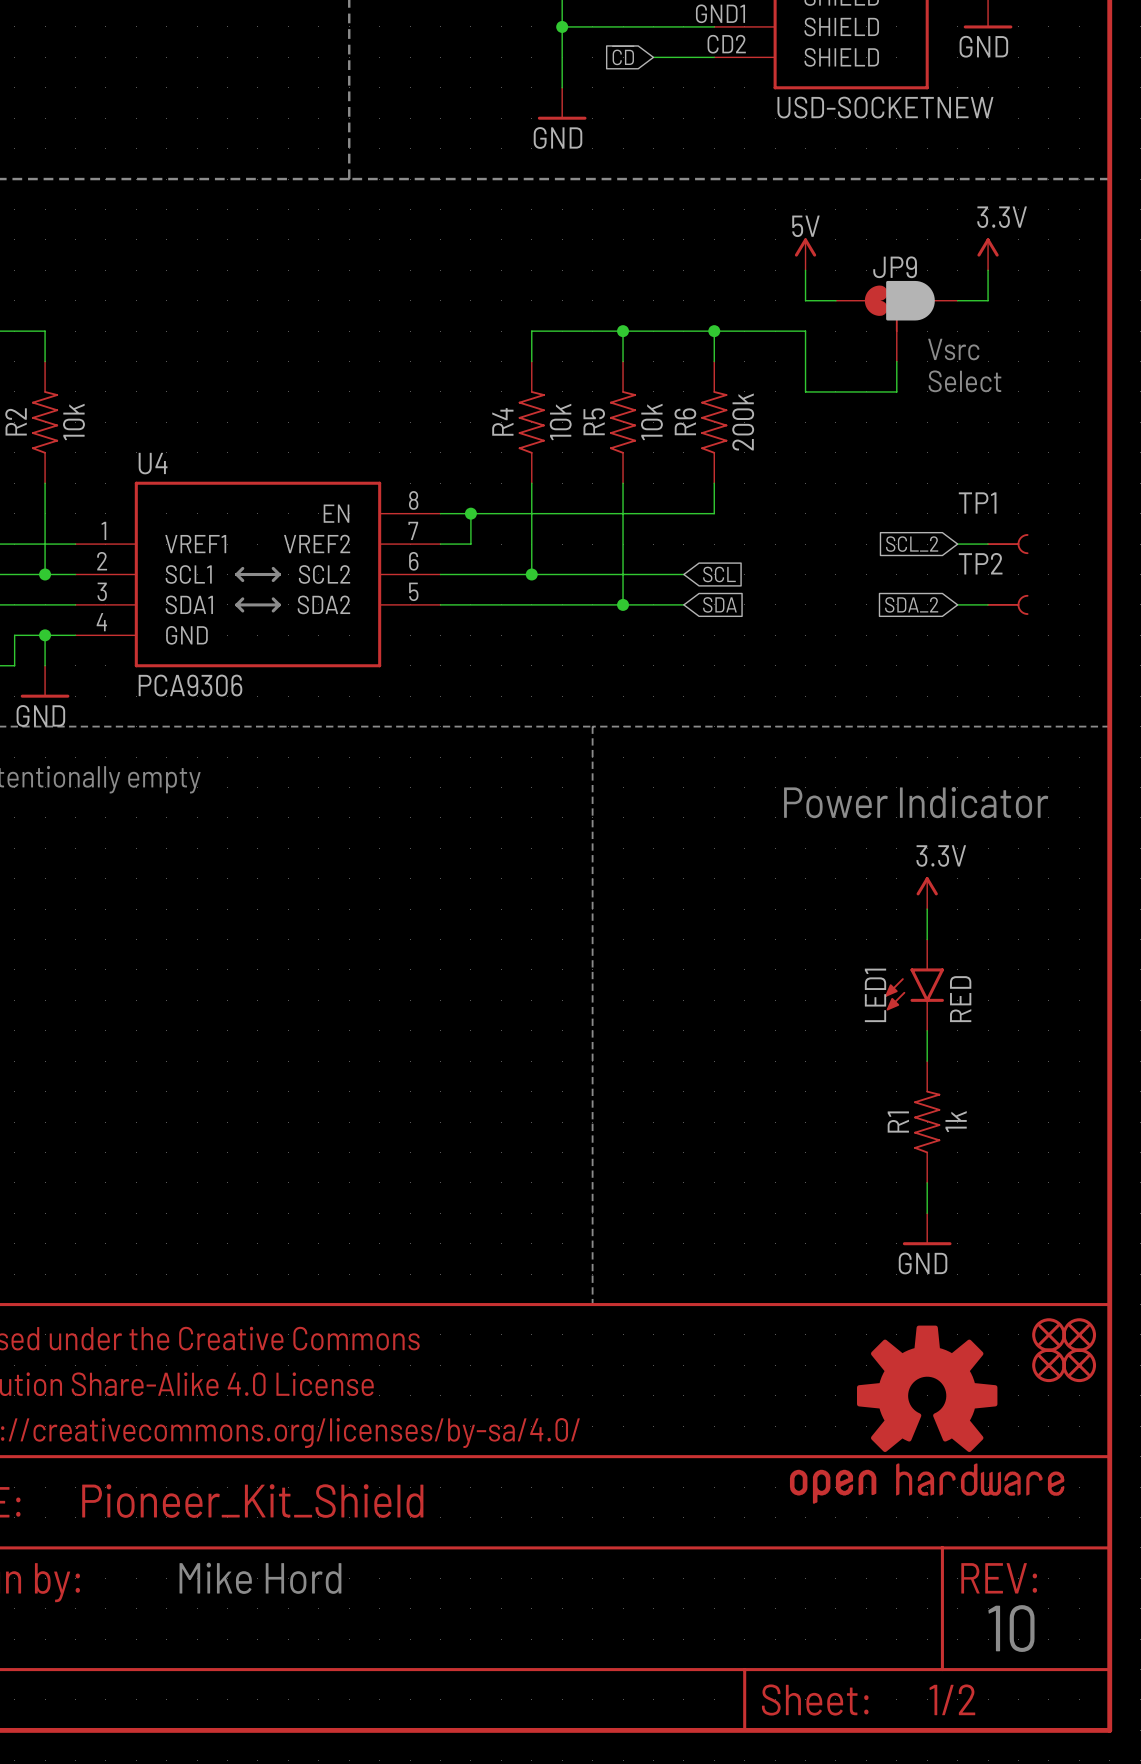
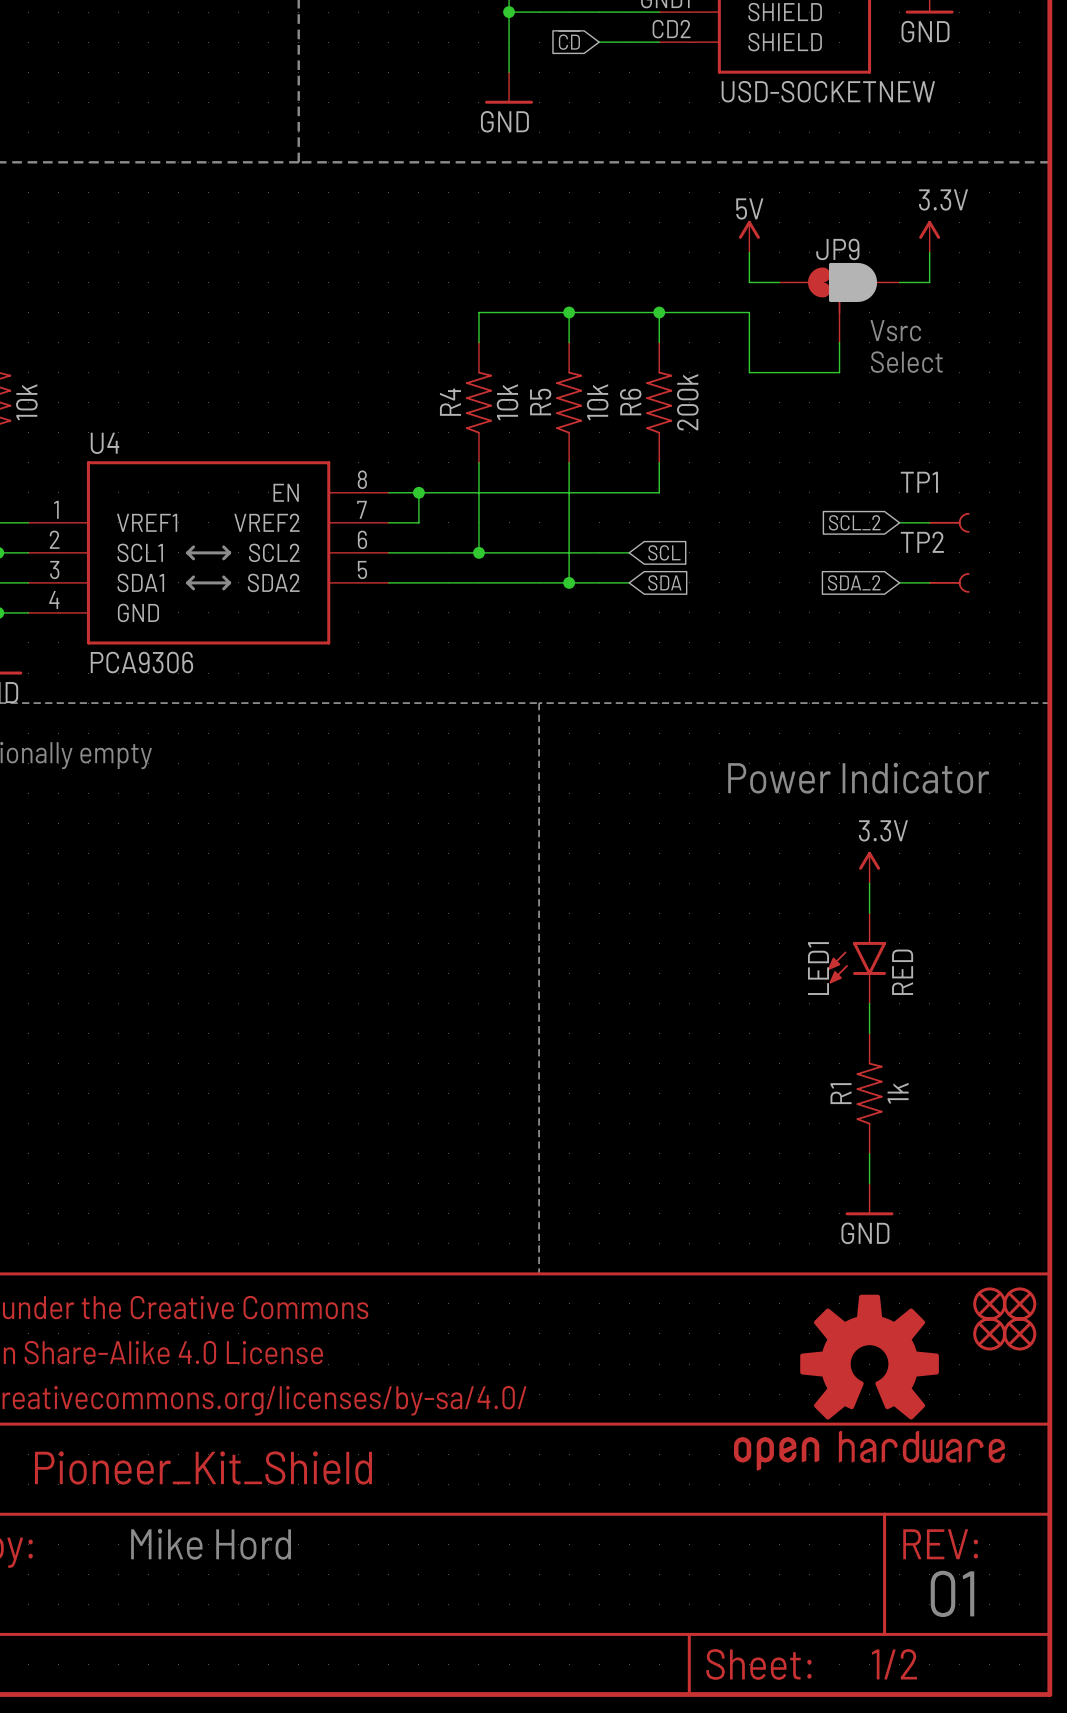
text: 10 (1011, 1628) -> 01 (952, 1593)

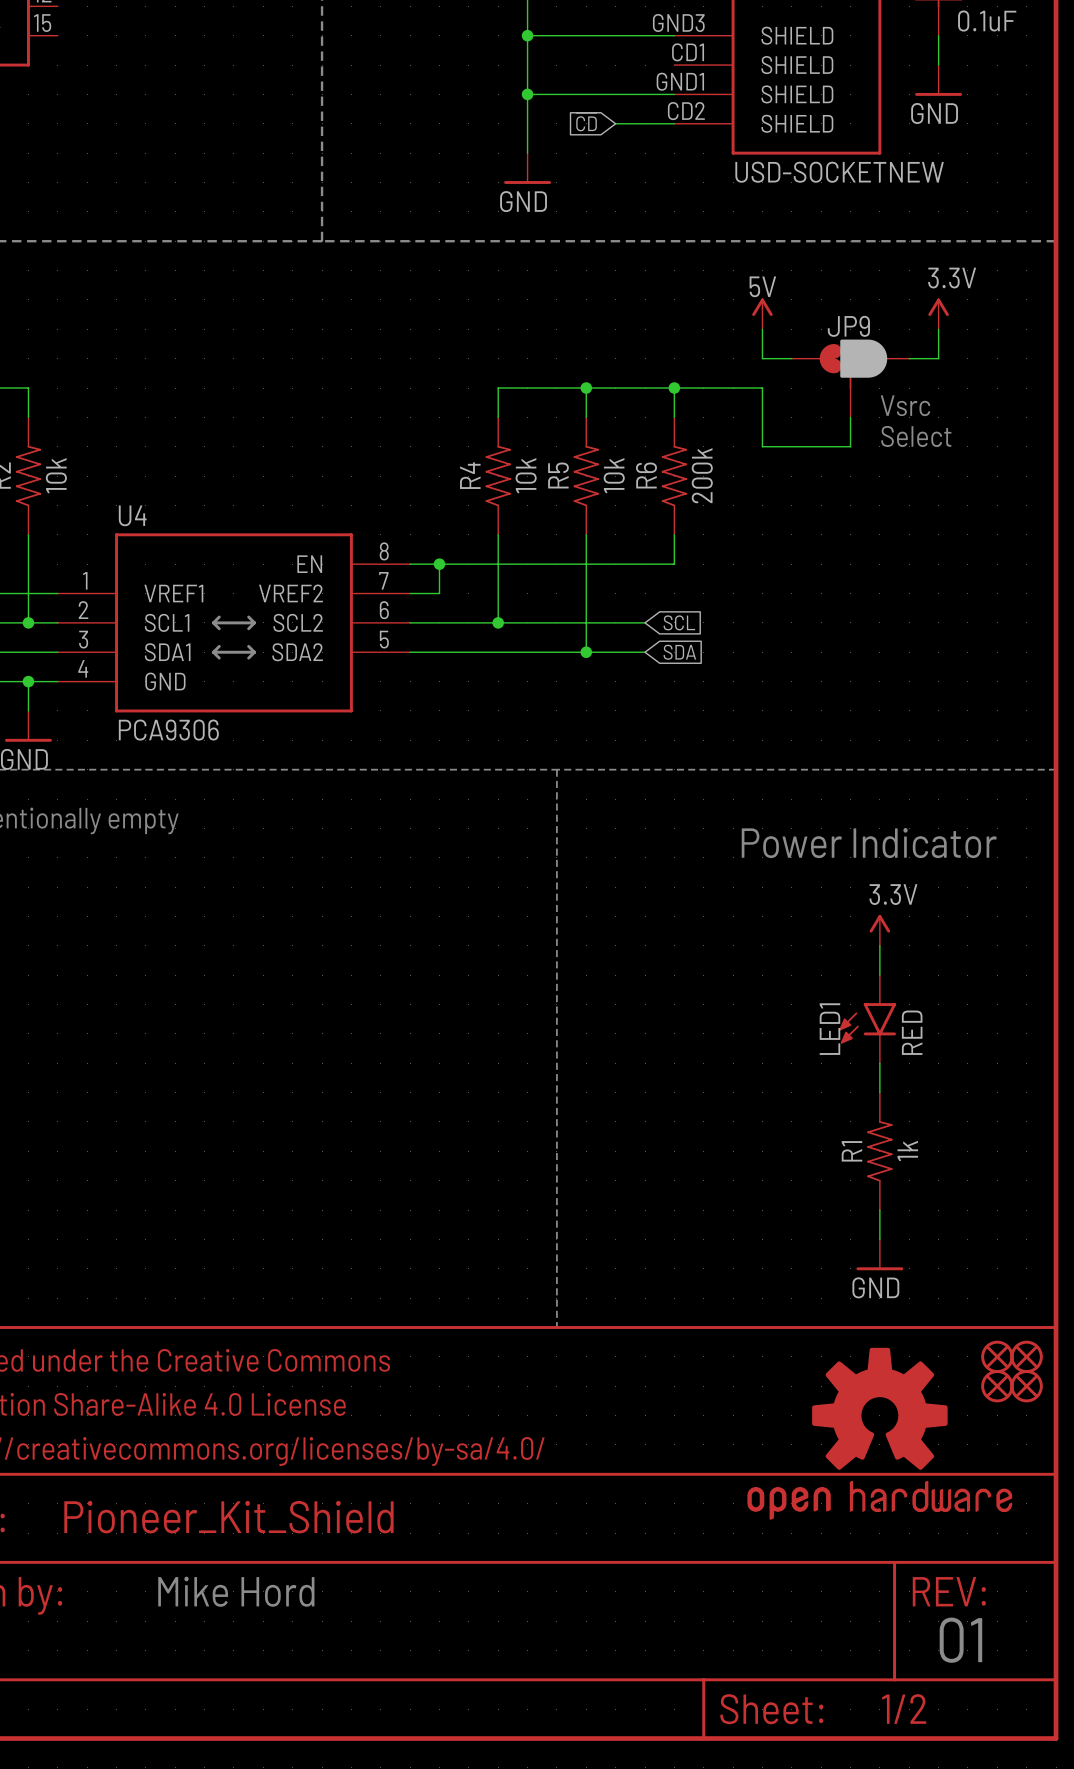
global label: SCL_2 (854, 522) -> none
wire: (899, 522) (929, 522) -> none
TP1: (949, 522) -> none
global label: SDA_2 (854, 582) -> none
wire: (899, 582) (929, 582) -> none
TP2: (949, 582) -> none

